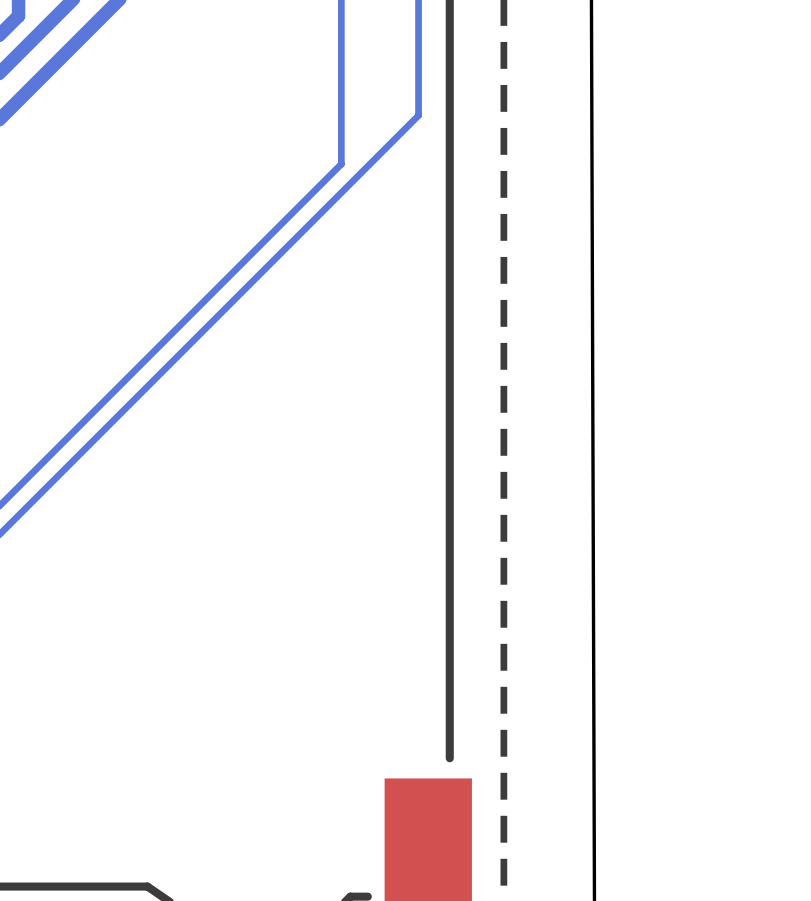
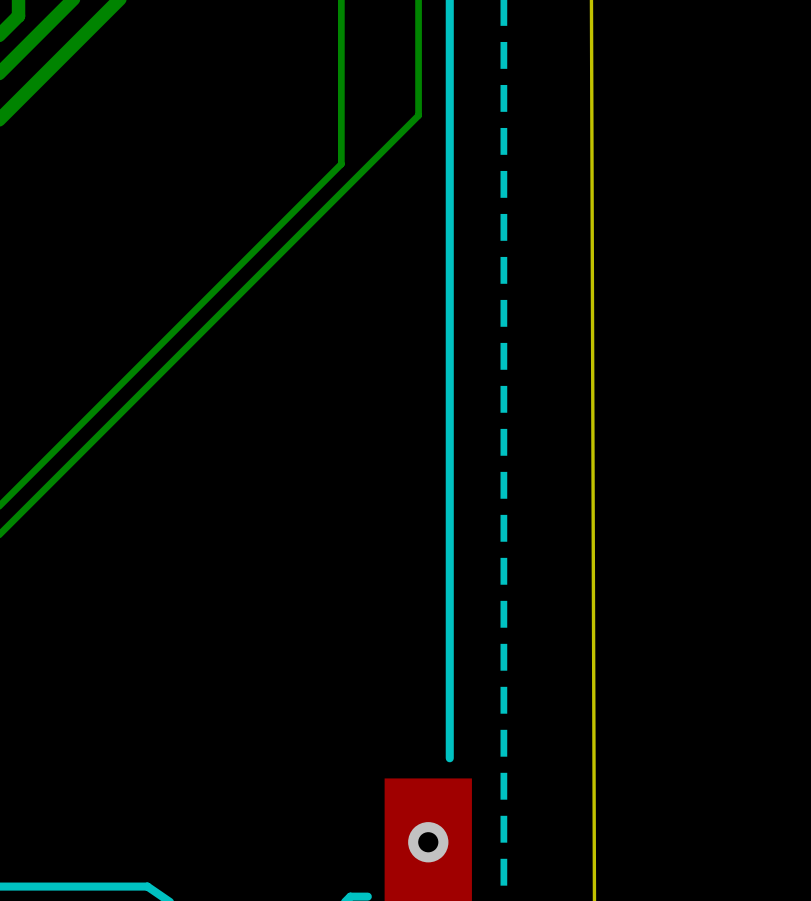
via: none -> (428, 842)

